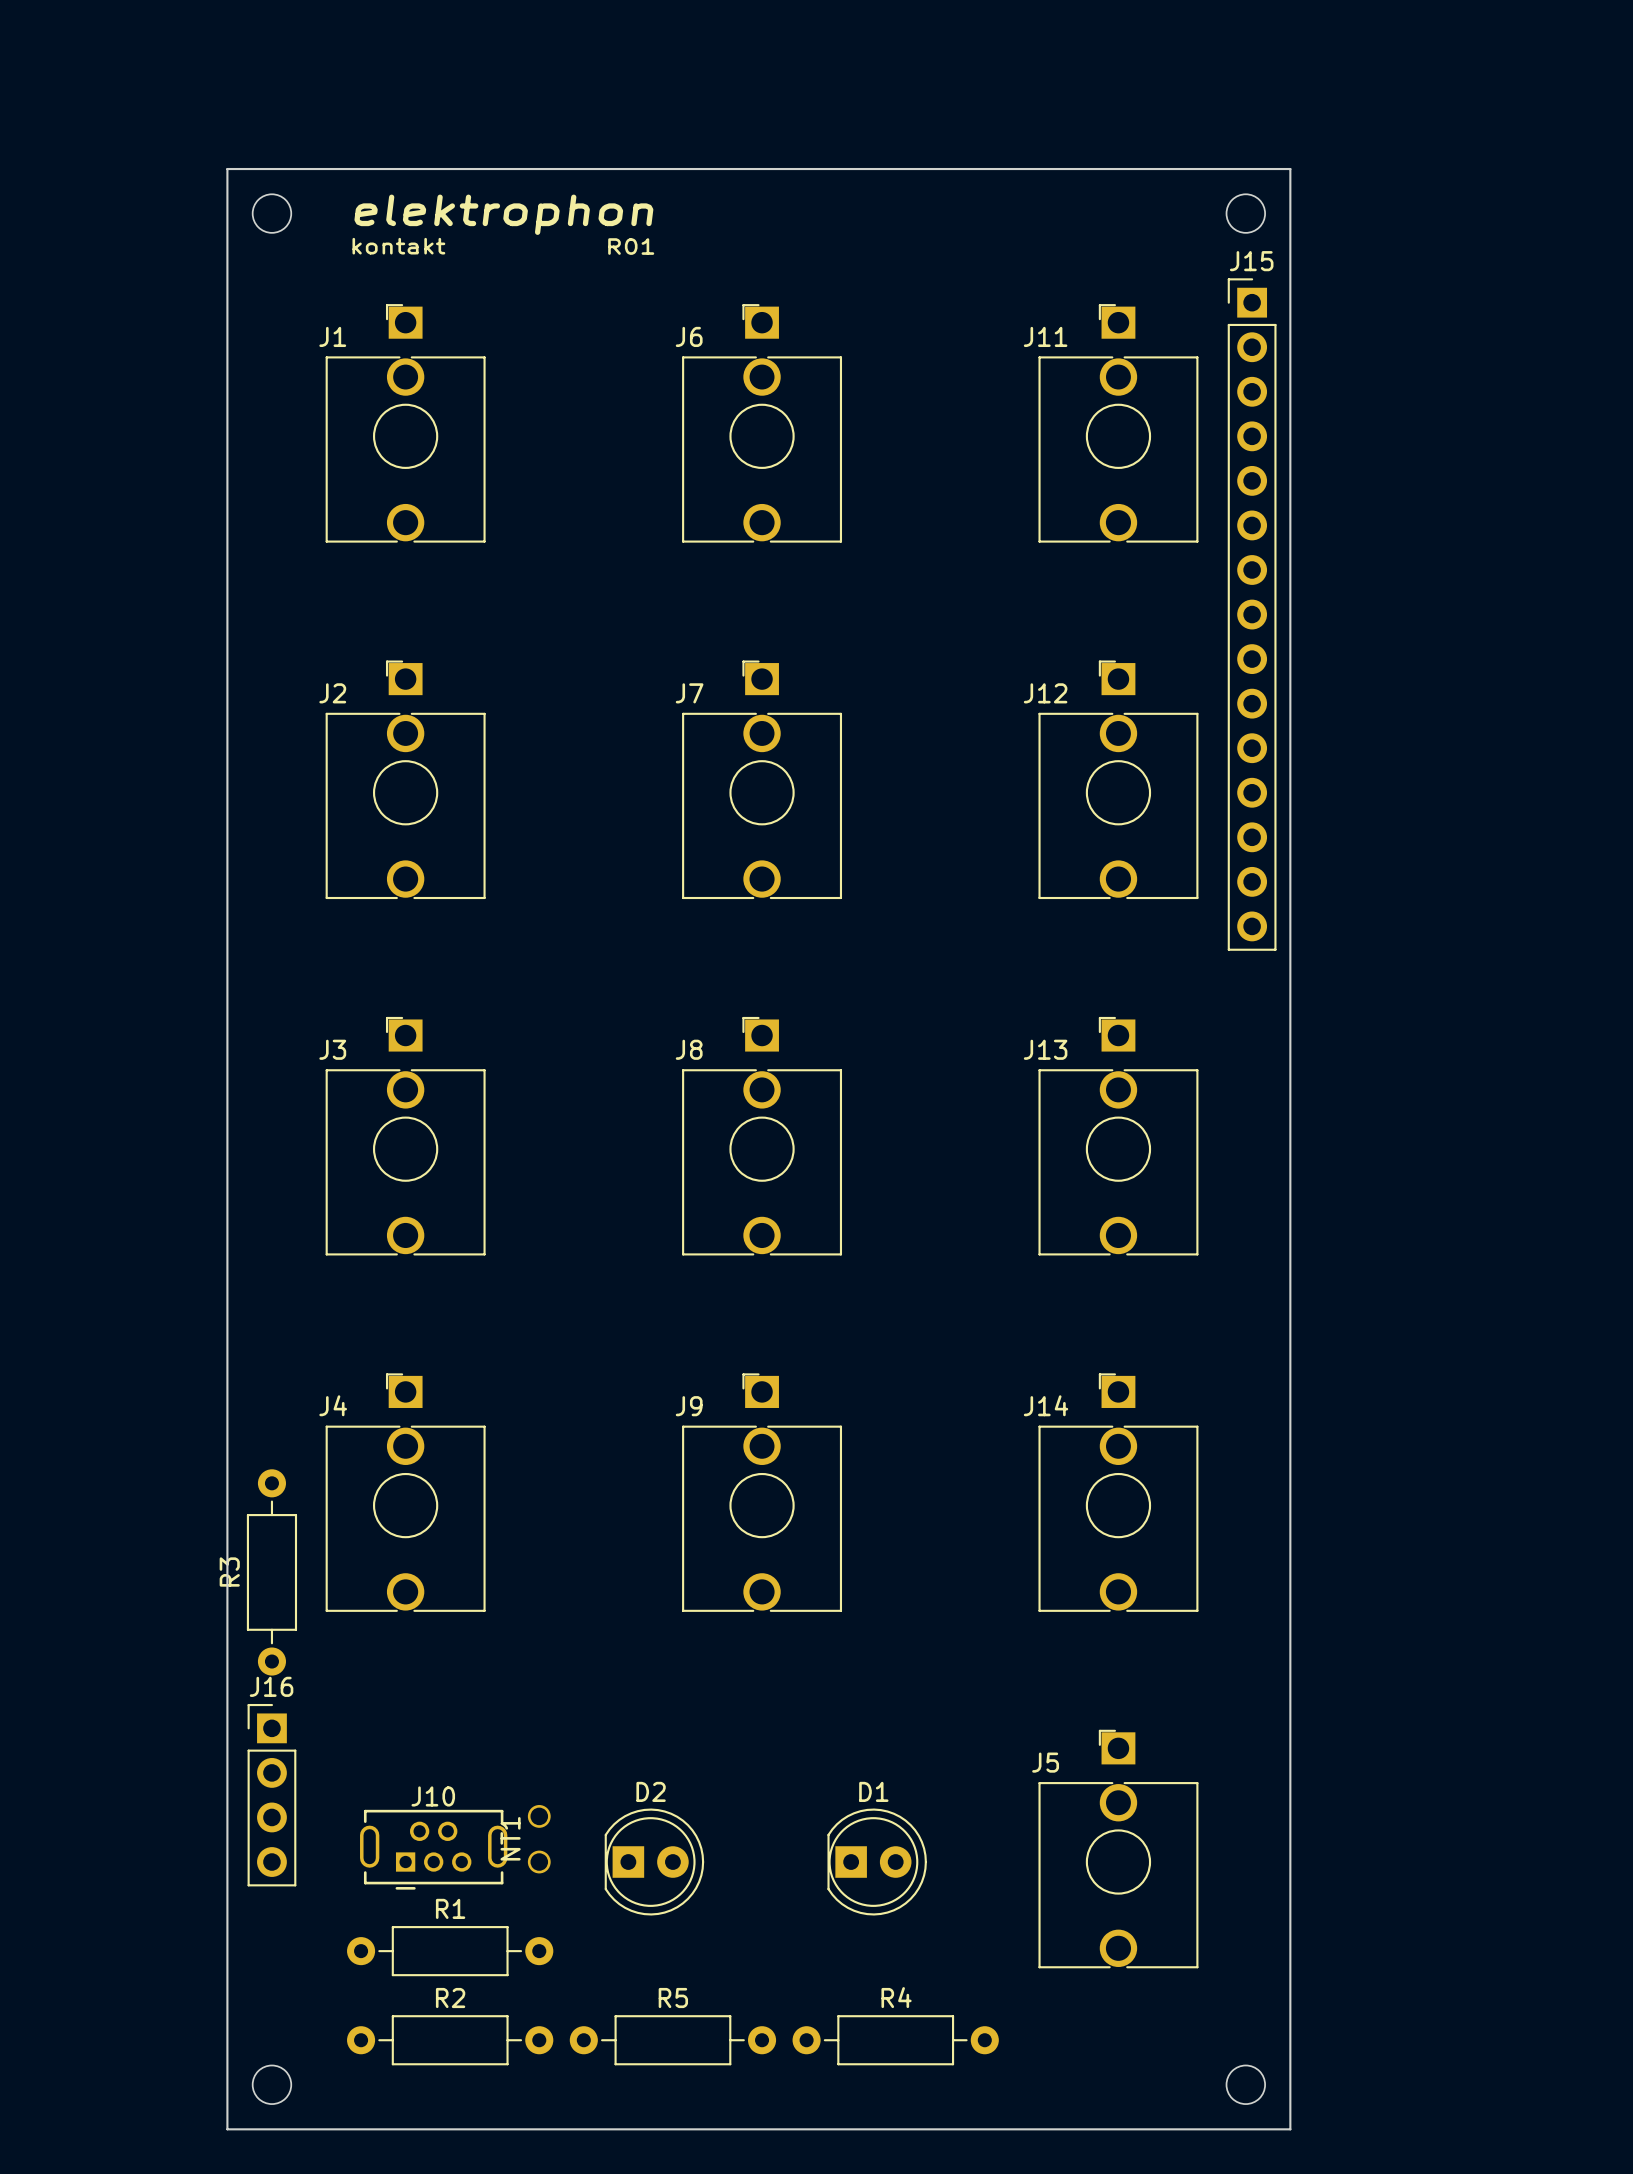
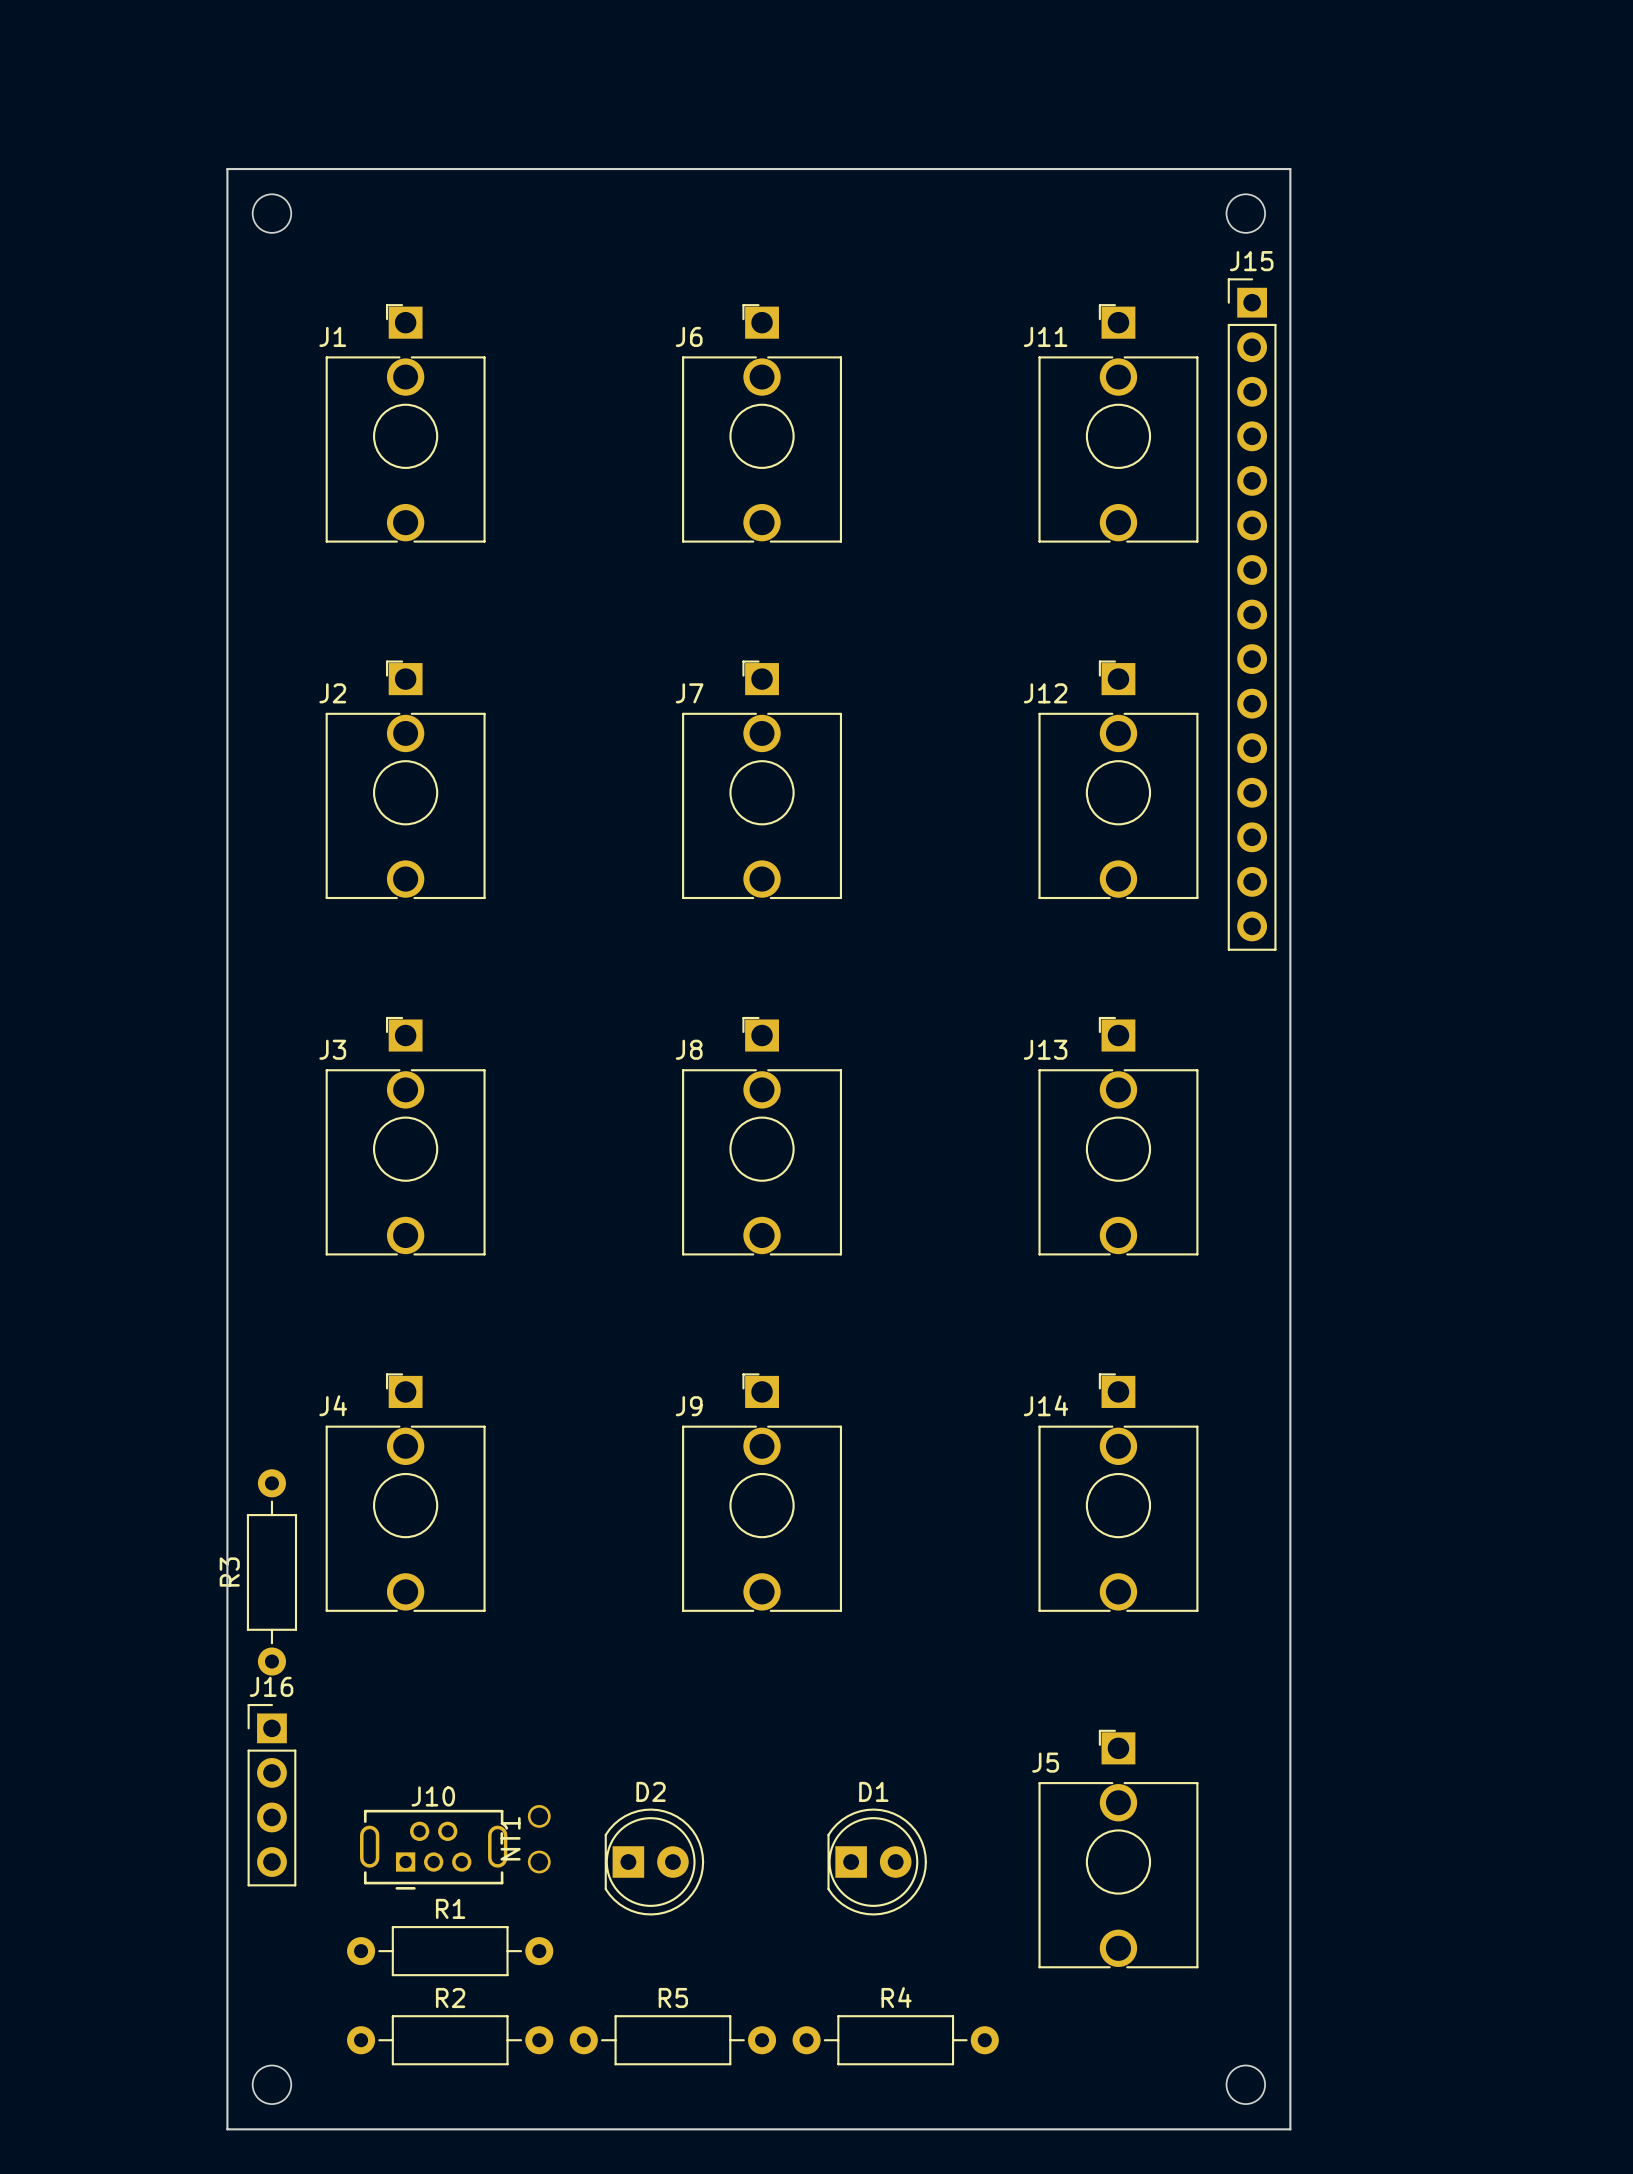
drawing: [352, 194, 655, 255] -> none

